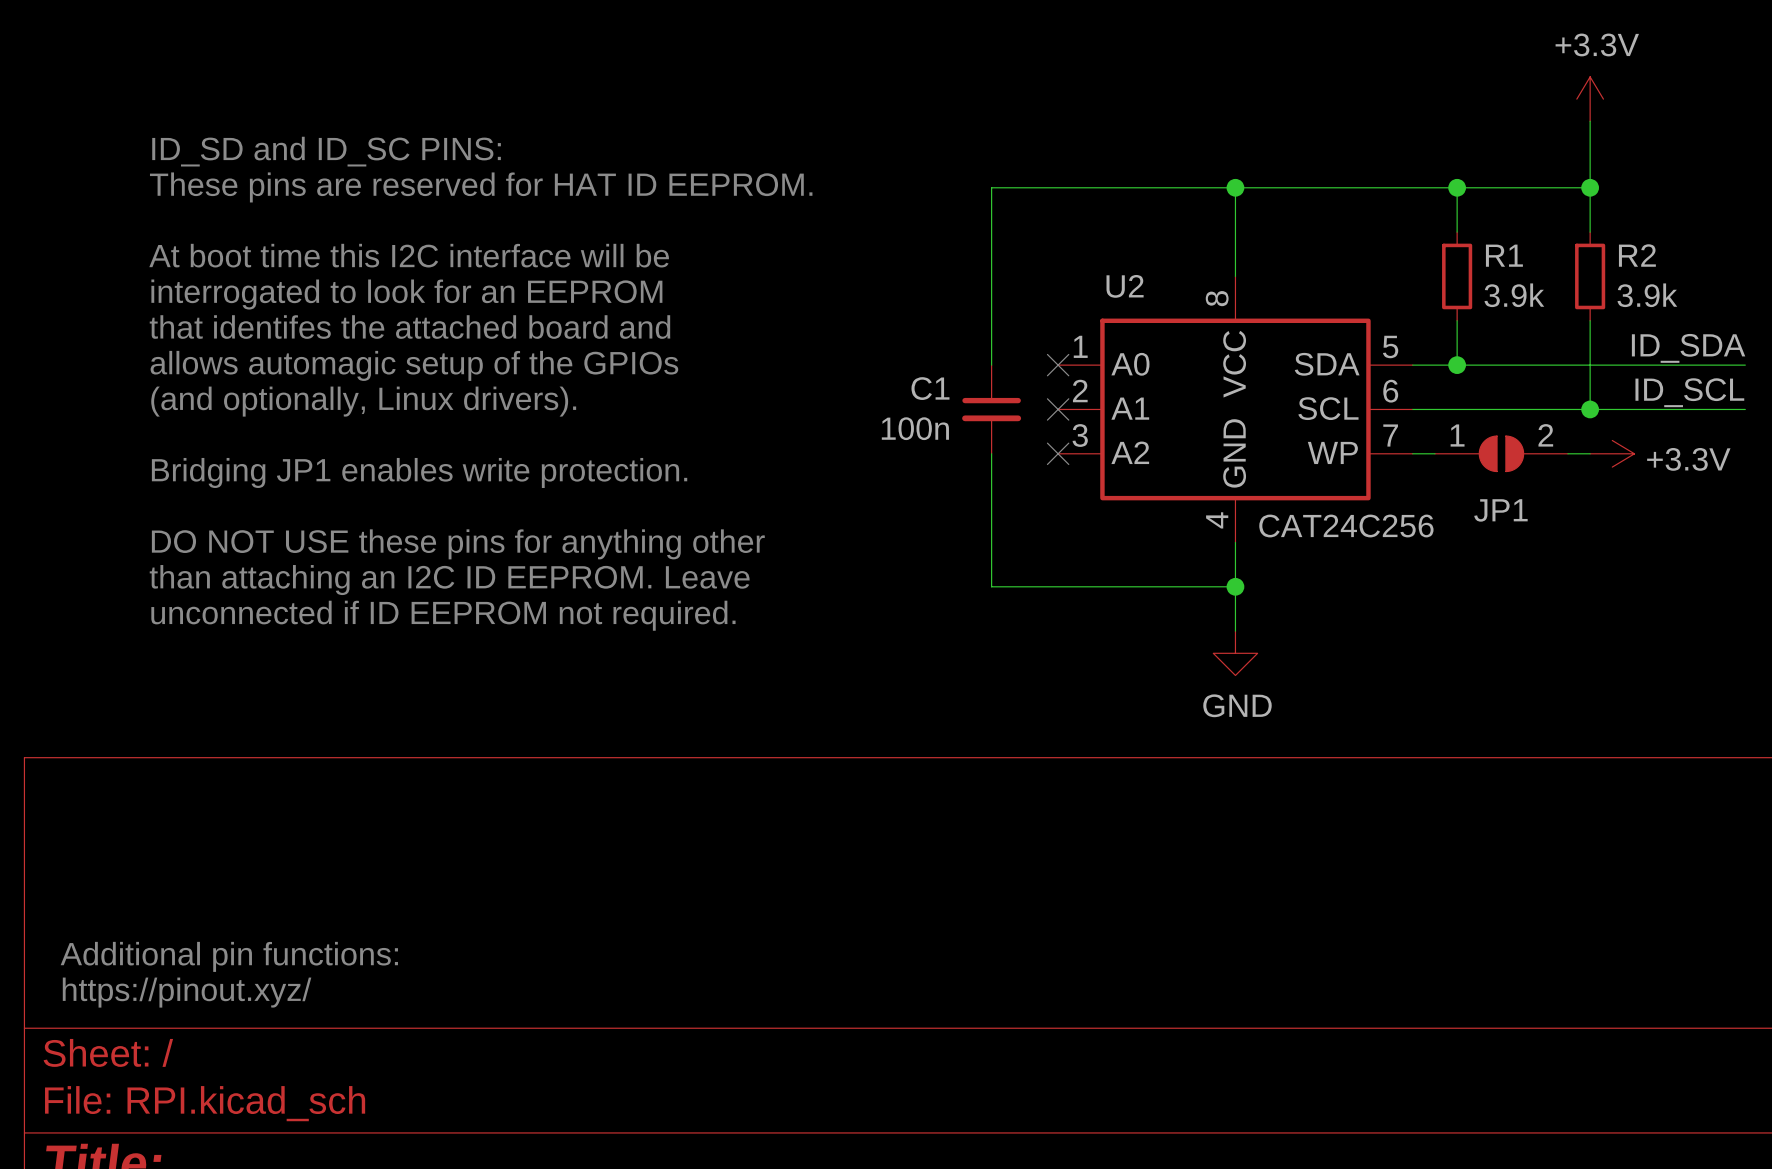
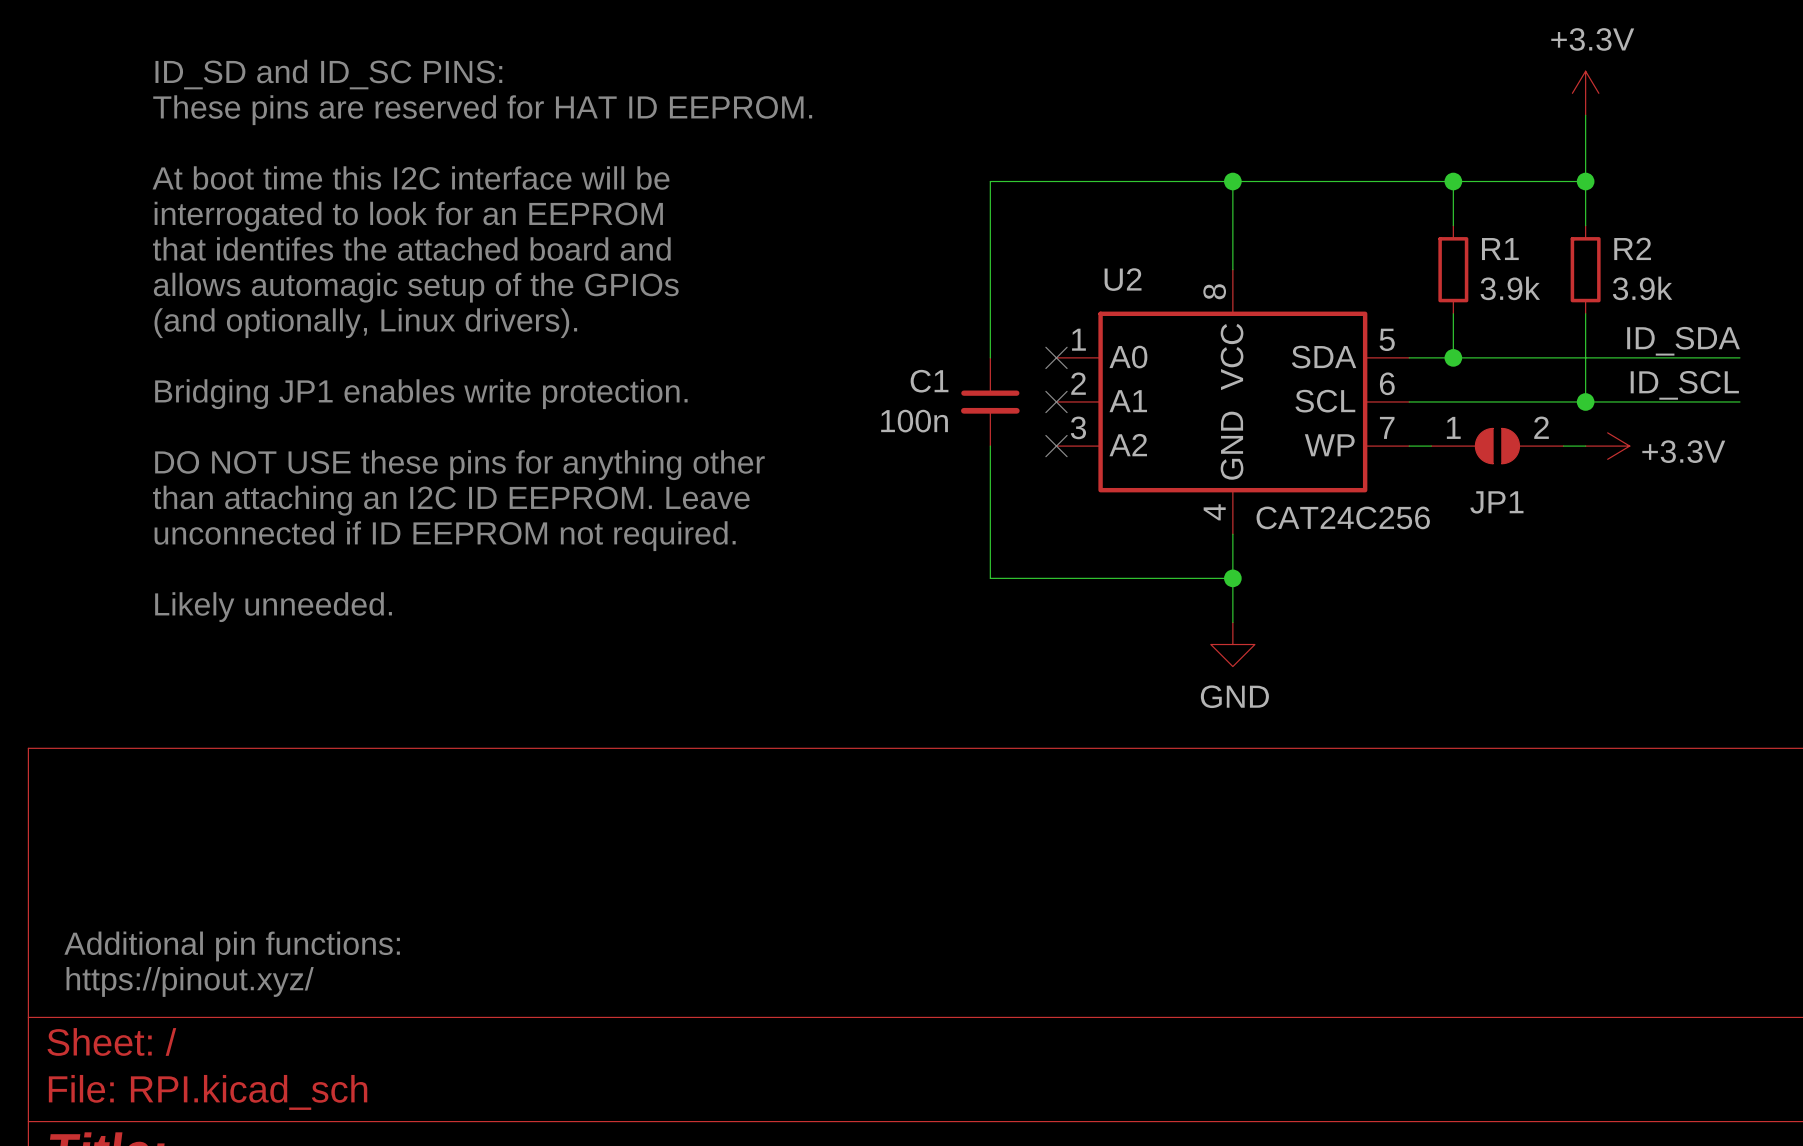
text: none -> These pins are reserved for HAT ID EEPROM. (482, 110)
text position: ID_SD and ID_SC PINS: (326, 151) -> ID_SD and ID_SC PINS: (328, 74)
text: These pins are reserved for HAT ID EEPROM. (481, 187) -> At boot time this I2C interface will be (411, 178)
text: none -> interrogated to look for an EEPROM (408, 216)
text: At boot time this I2C interface will be (409, 255) -> that identifes the attached board and (411, 249)
text: interrogated to look for an EEPROM (406, 294) -> allows automagic setup of the GPIOs (416, 287)
text: that identifes the attached board and (410, 327) -> (and optionally, Linux drivers). (365, 323)
text: allows automagic setup of the GPIOs (414, 365) -> none
text: (and optionally, Linux drivers). (363, 401) -> Bridging JP1 enables write protection. (421, 394)
text: Bridging JP1 enables write protection. (419, 472) -> DO NOT USE these pins for anything other (459, 465)
text: DO NOT USE these pins for anything other (458, 544) -> unconnected if ID EEPROM not required. (445, 536)
text position: than attaching an I2C ID EEPROM. Leave (449, 580) -> than attaching an I2C ID EEPROM. Leave (451, 500)
text: unconnected if ID EEPROM not required. (443, 615) -> Likely unneeded. (273, 607)

